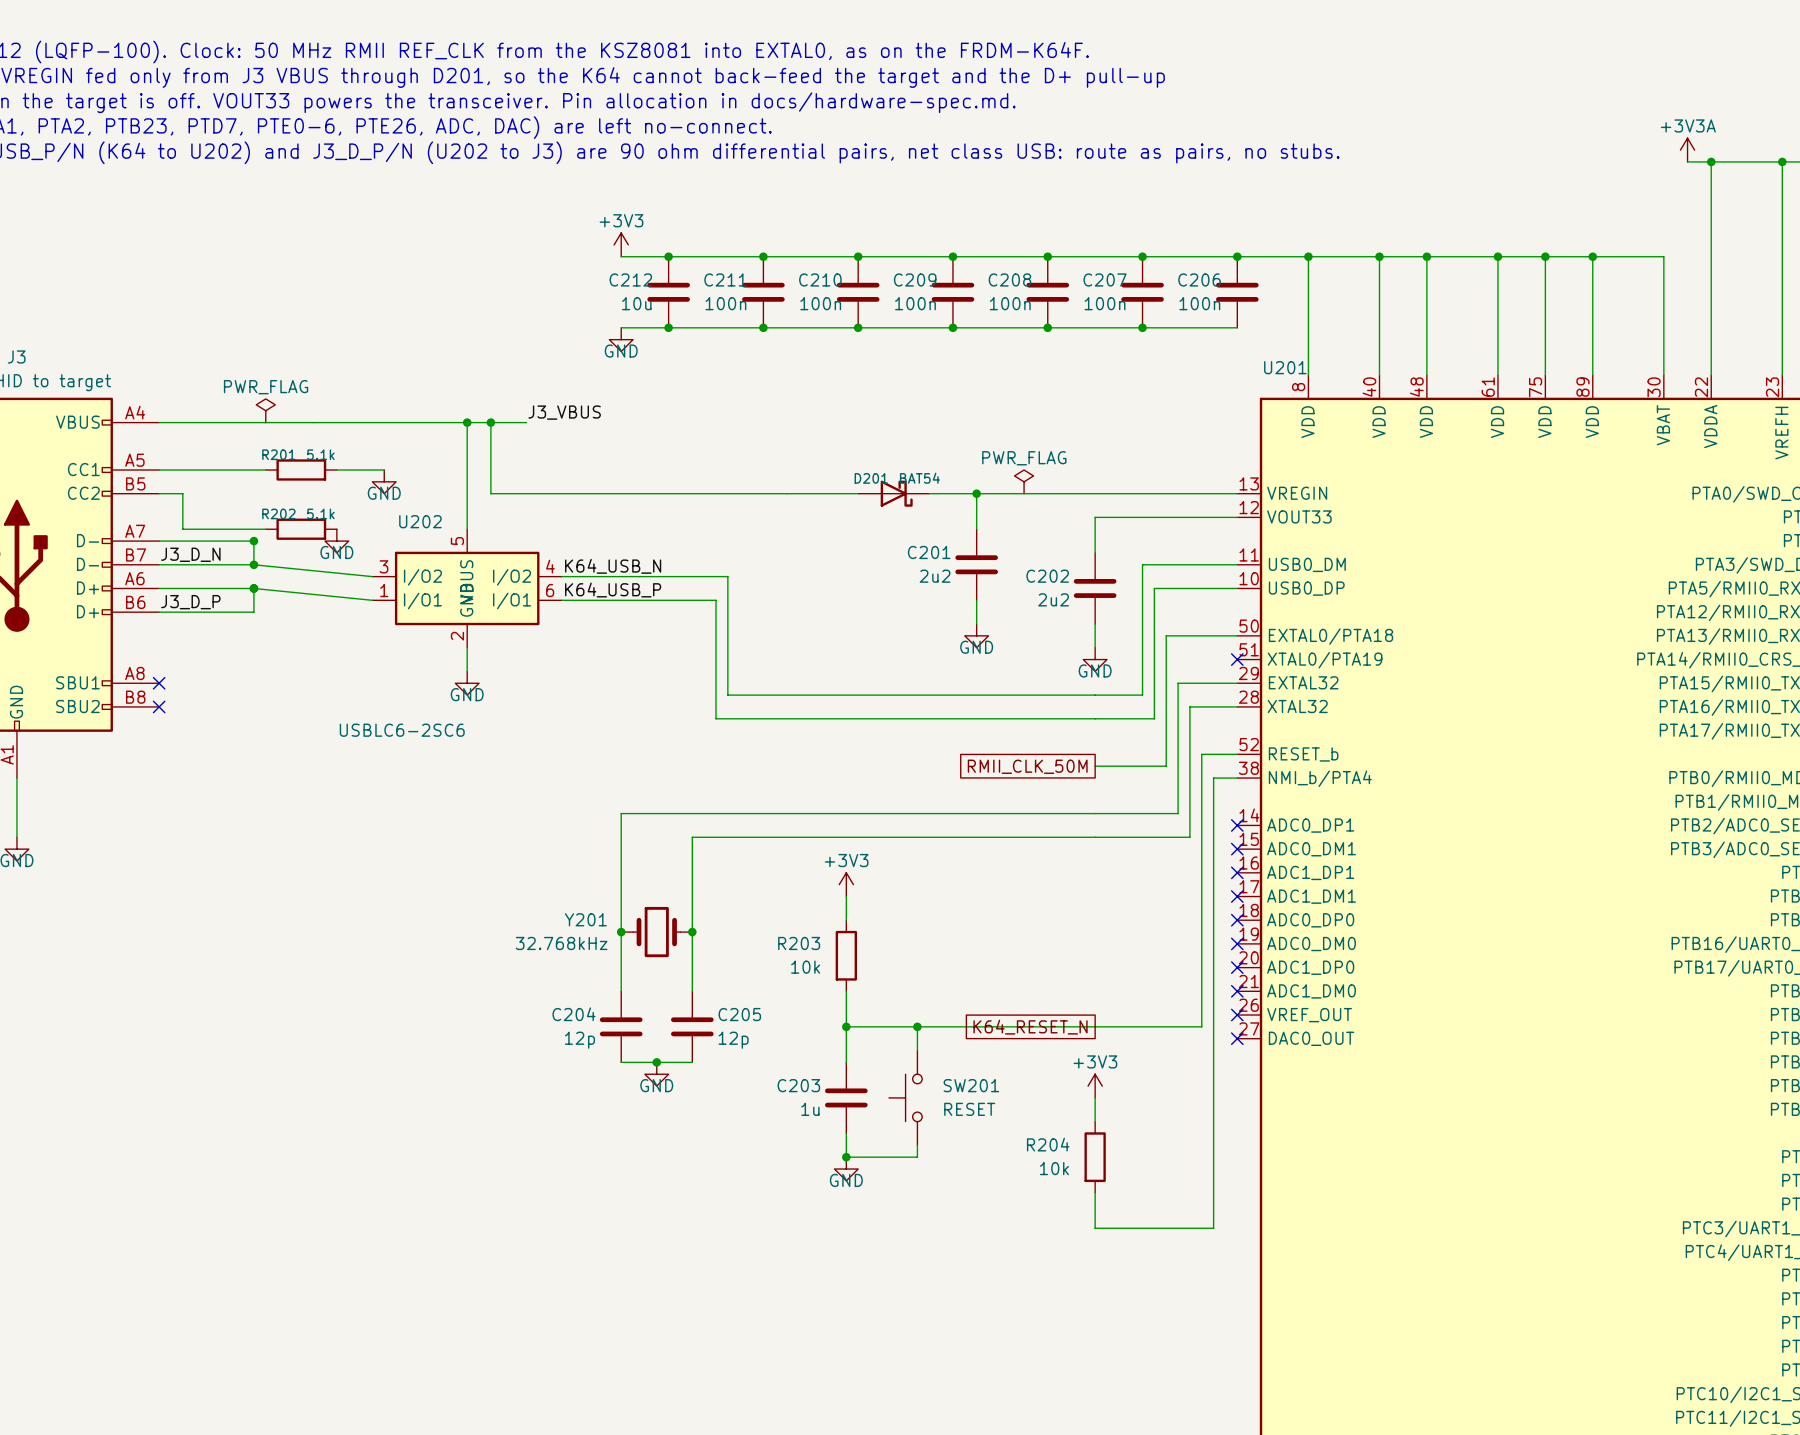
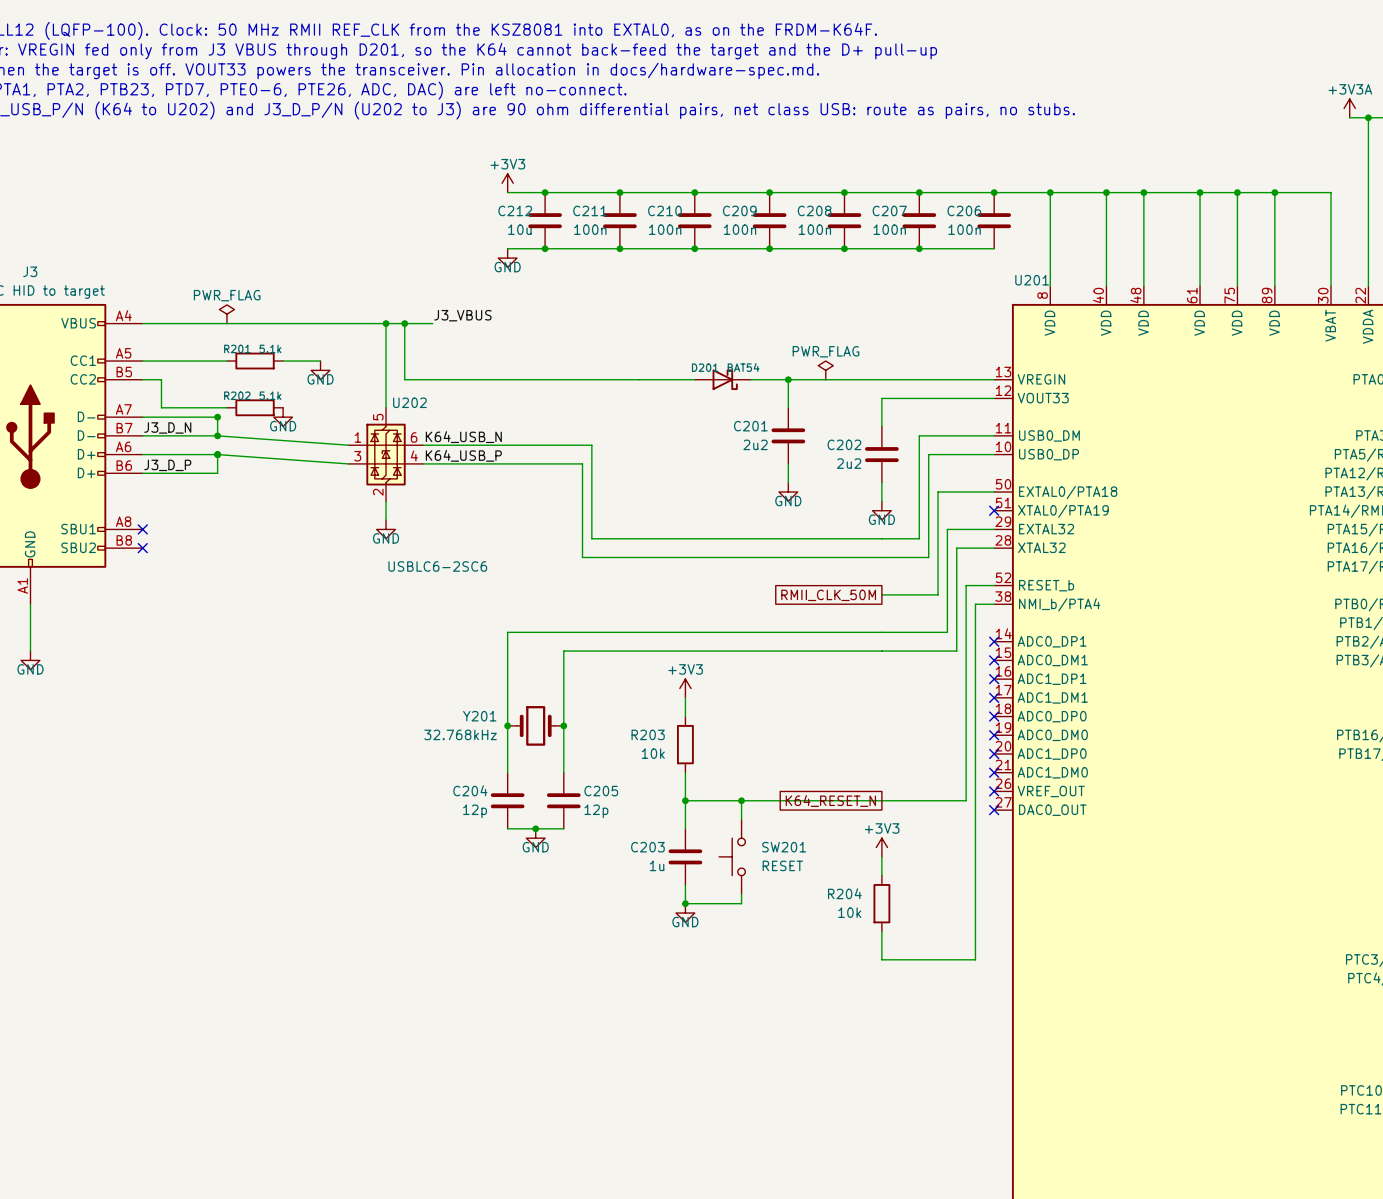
U202 name position: U202 (420, 521) -> U202 (409, 402)
U202 symbol: [372, 529, 562, 648] -> [348, 407, 424, 502]
wire: (253, 564) (372, 576) -> (217, 435) (348, 445)
label position: K64_USB_N (613, 566) -> K64_USB_N (463, 437)
wire: (253, 588) (372, 600) -> (217, 454) (348, 463)
label position: K64_USB_P (613, 590) -> K64_USB_P (463, 455)
U202 value position: USBLC6-2SC6 (402, 730) -> USBLC6-2SC6 (437, 566)

